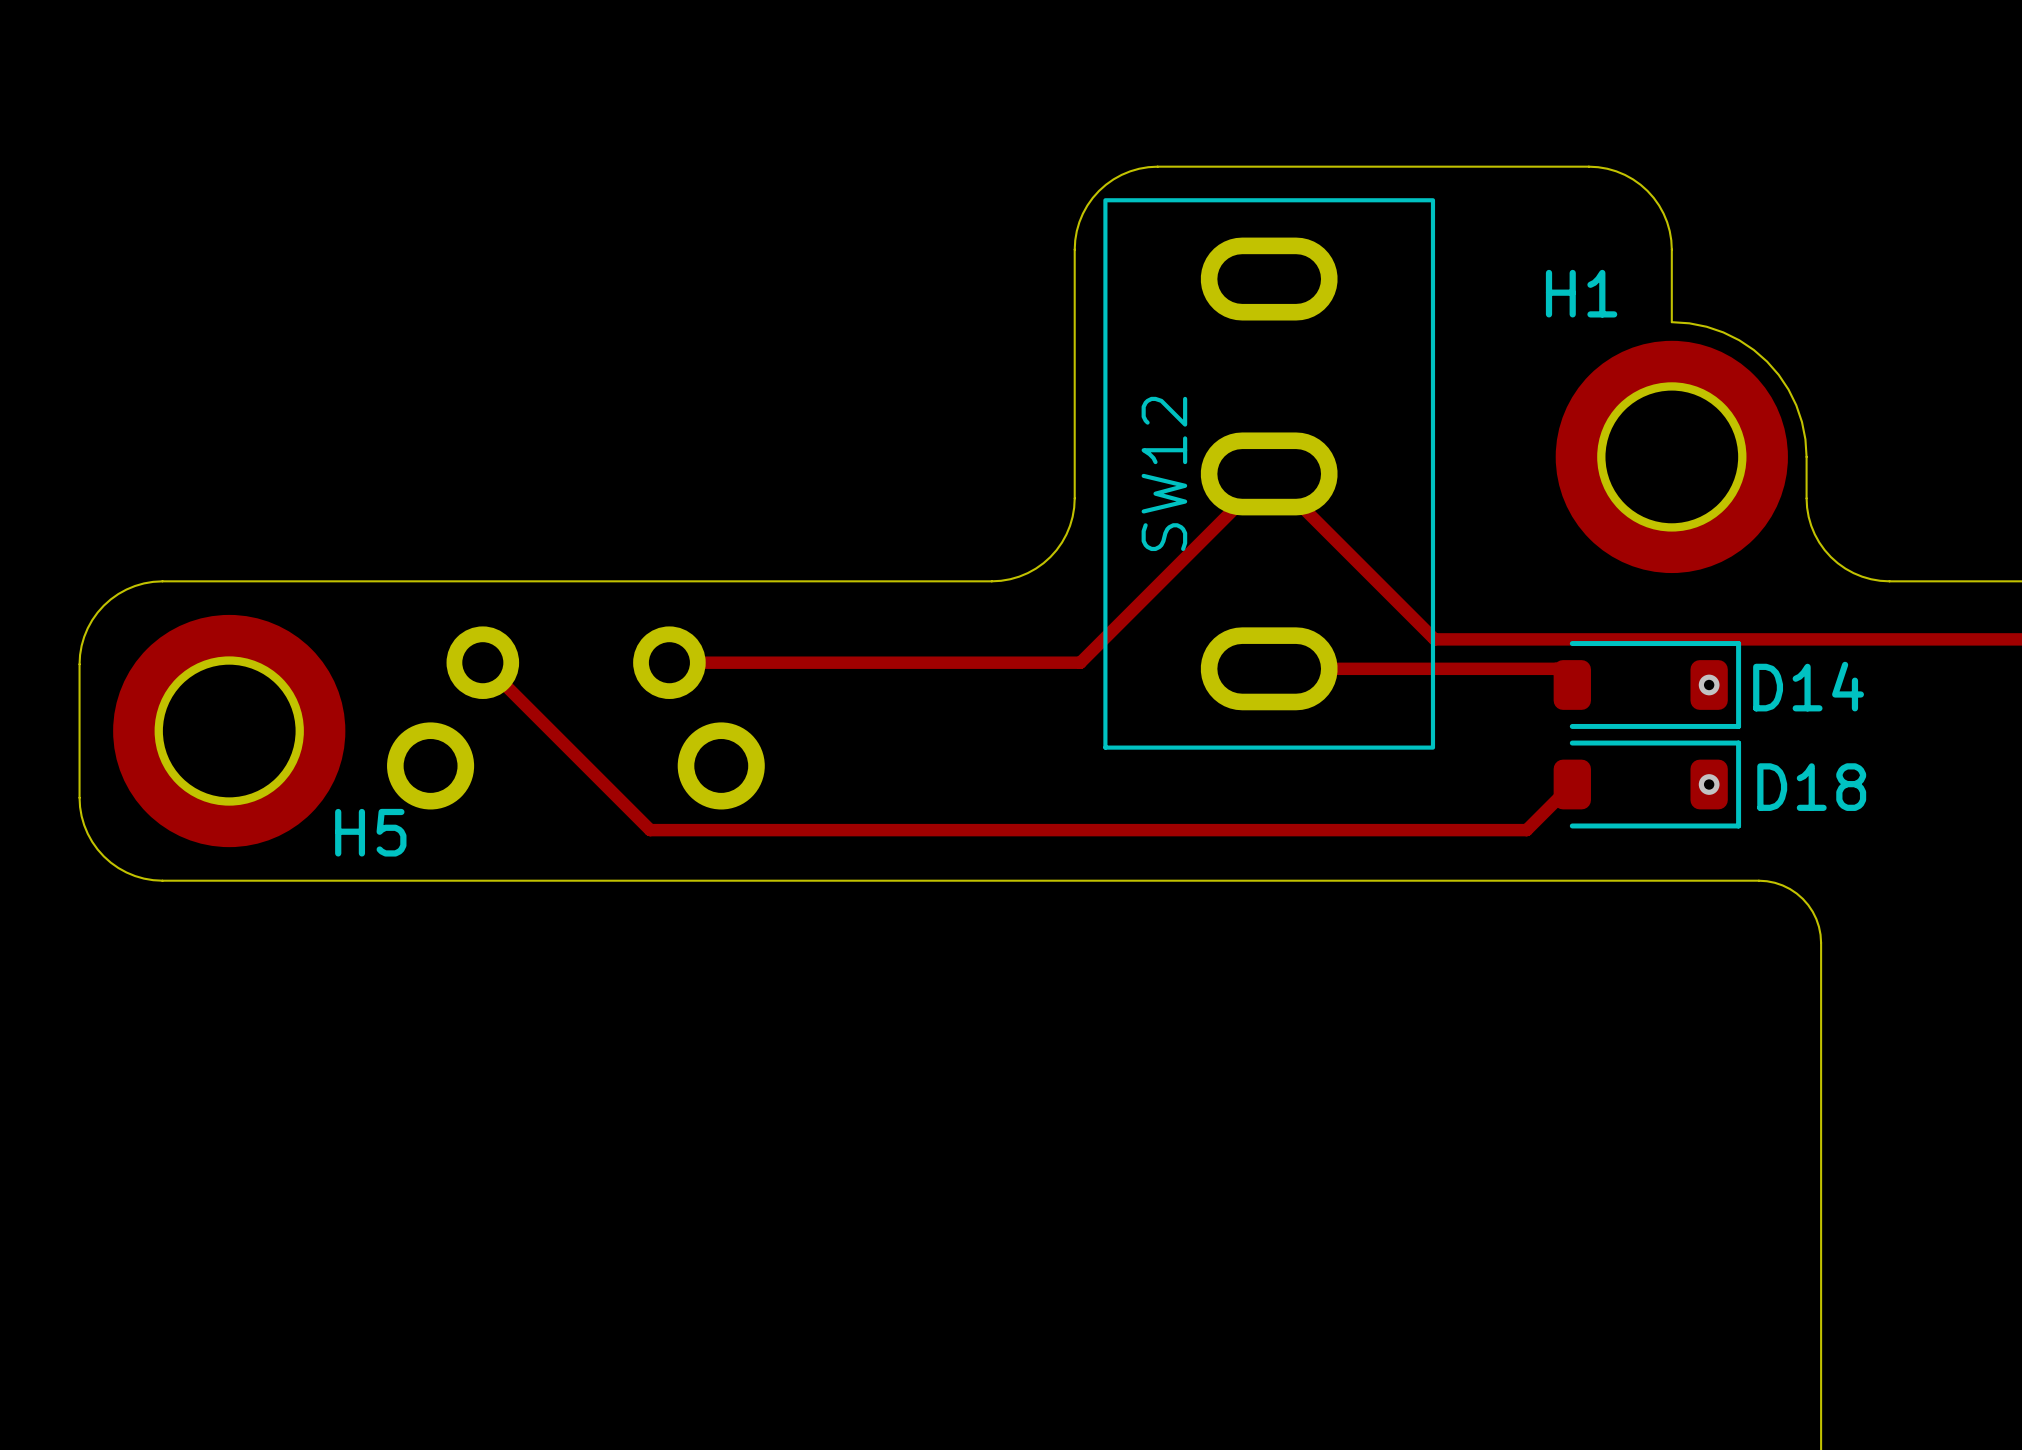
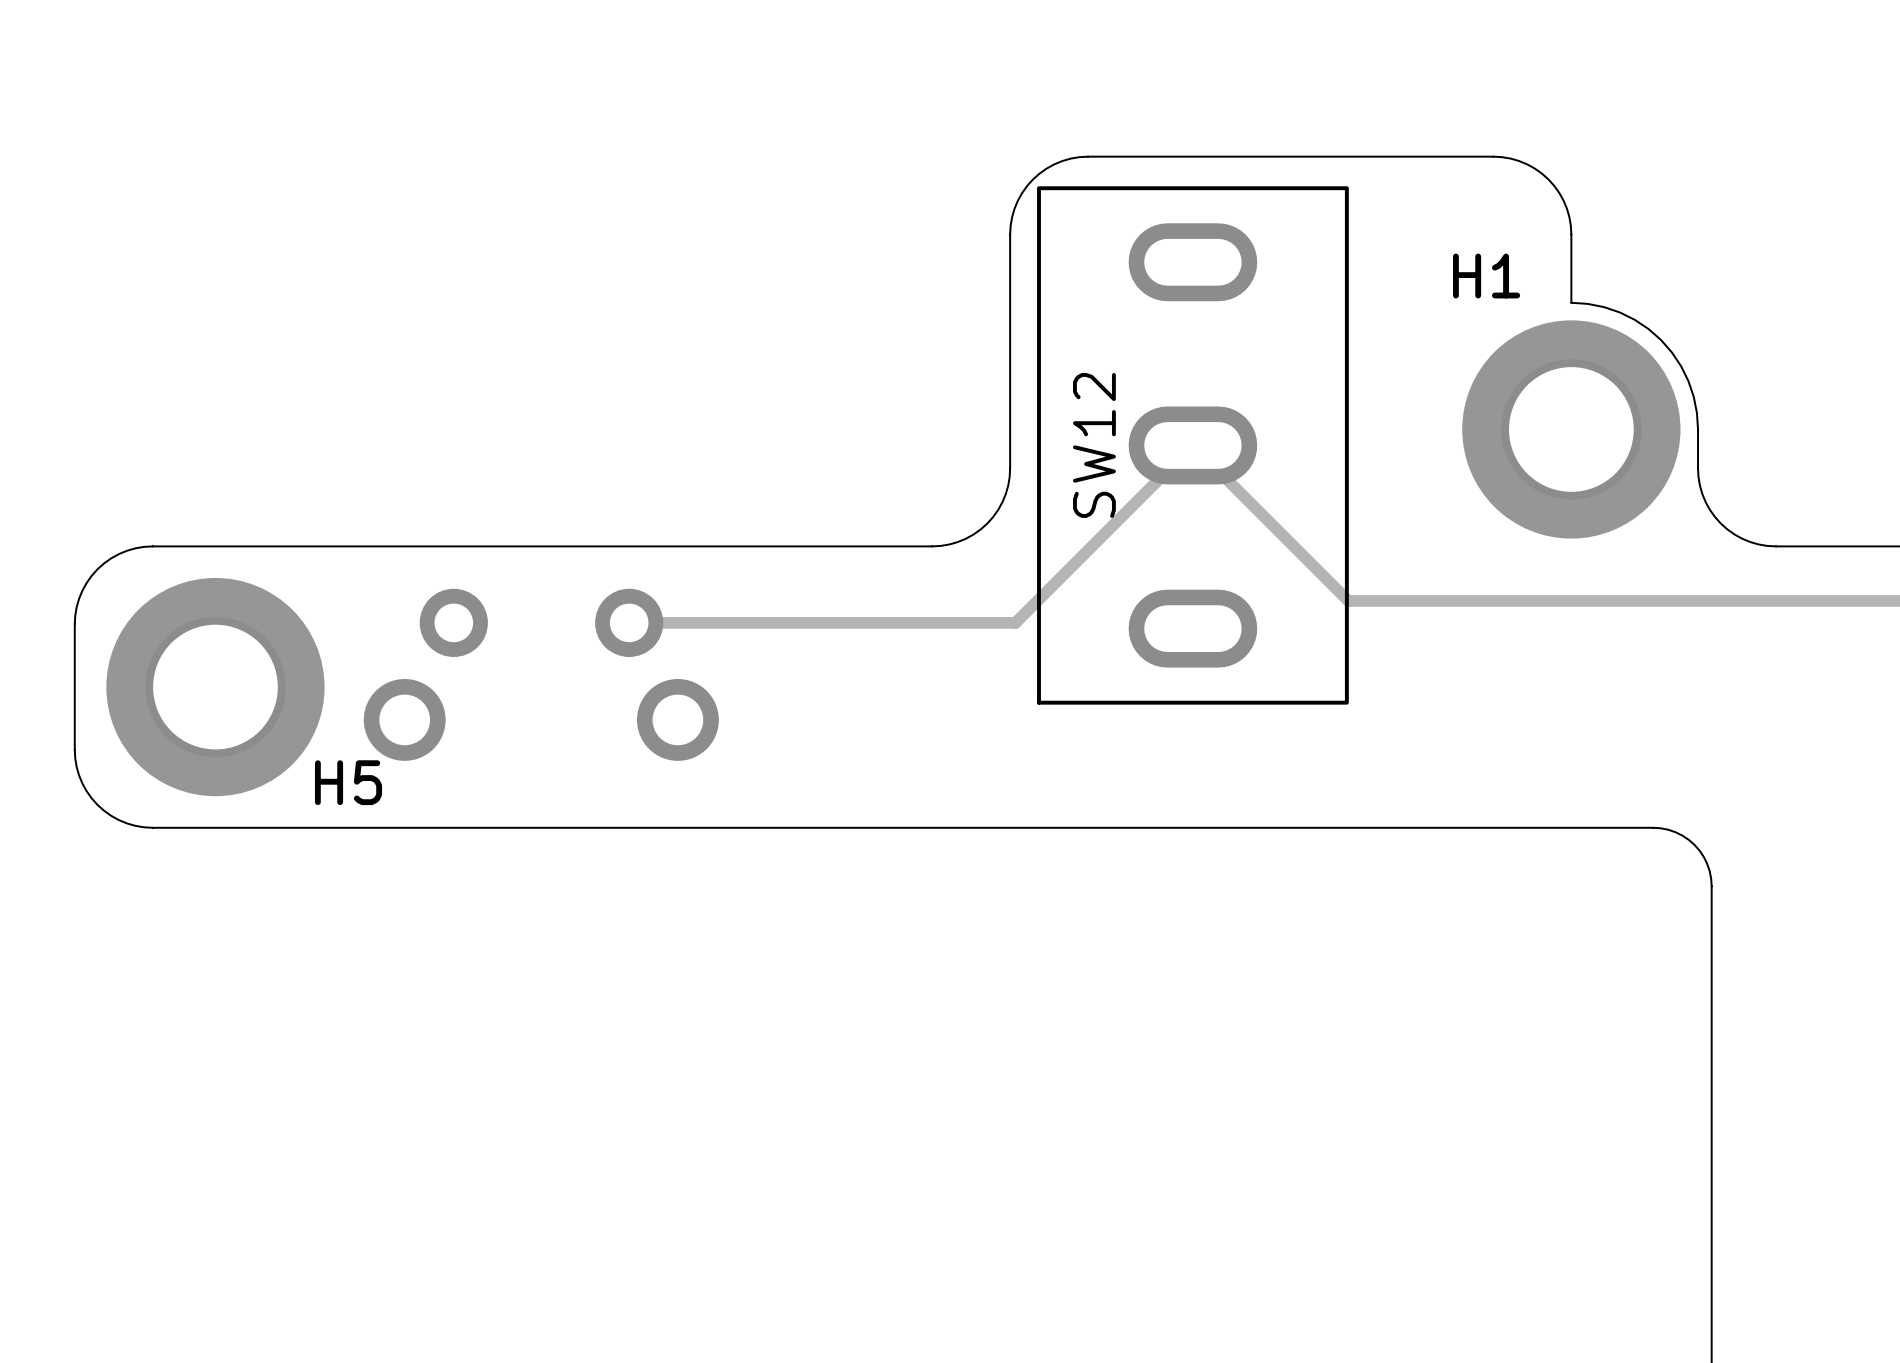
track: (482, 662) (650, 830) (1526, 830) (1572, 784) -> none
track: (1269, 668) (1556, 668) (1572, 684) -> none
D14: (1647, 684) -> none
via: (1709, 684) -> none
D18: (1647, 784) -> none
via: (1709, 784) -> none

